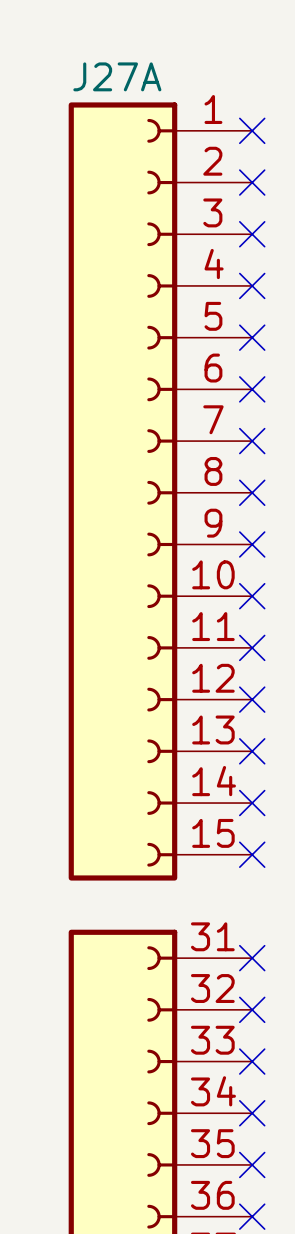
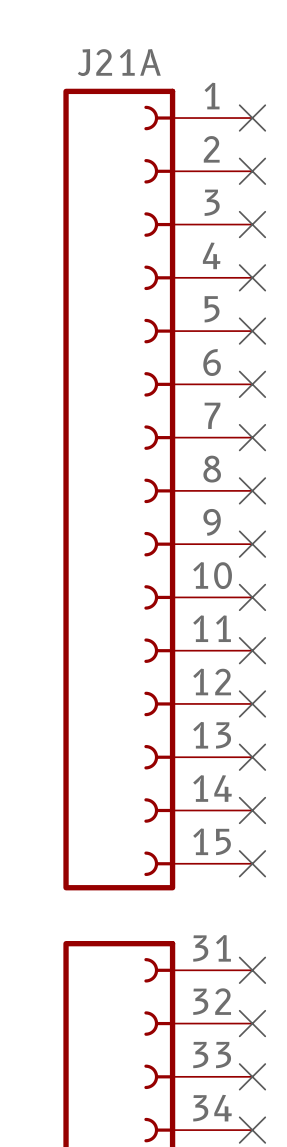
J27A name: J27A (117, 76) -> J21A (119, 62)

